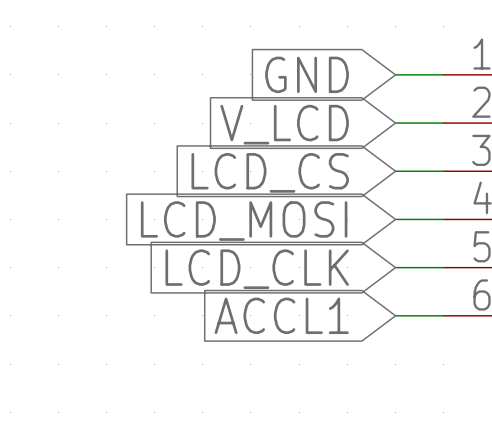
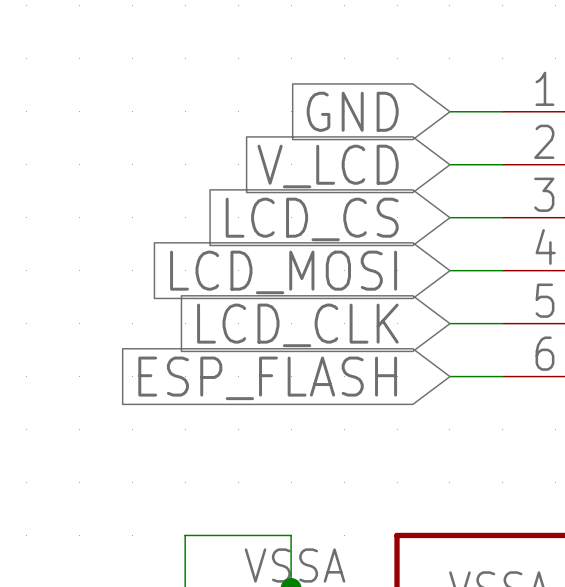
global label: ACCL1 (281, 315) -> ESP_FLASH (267, 378)

